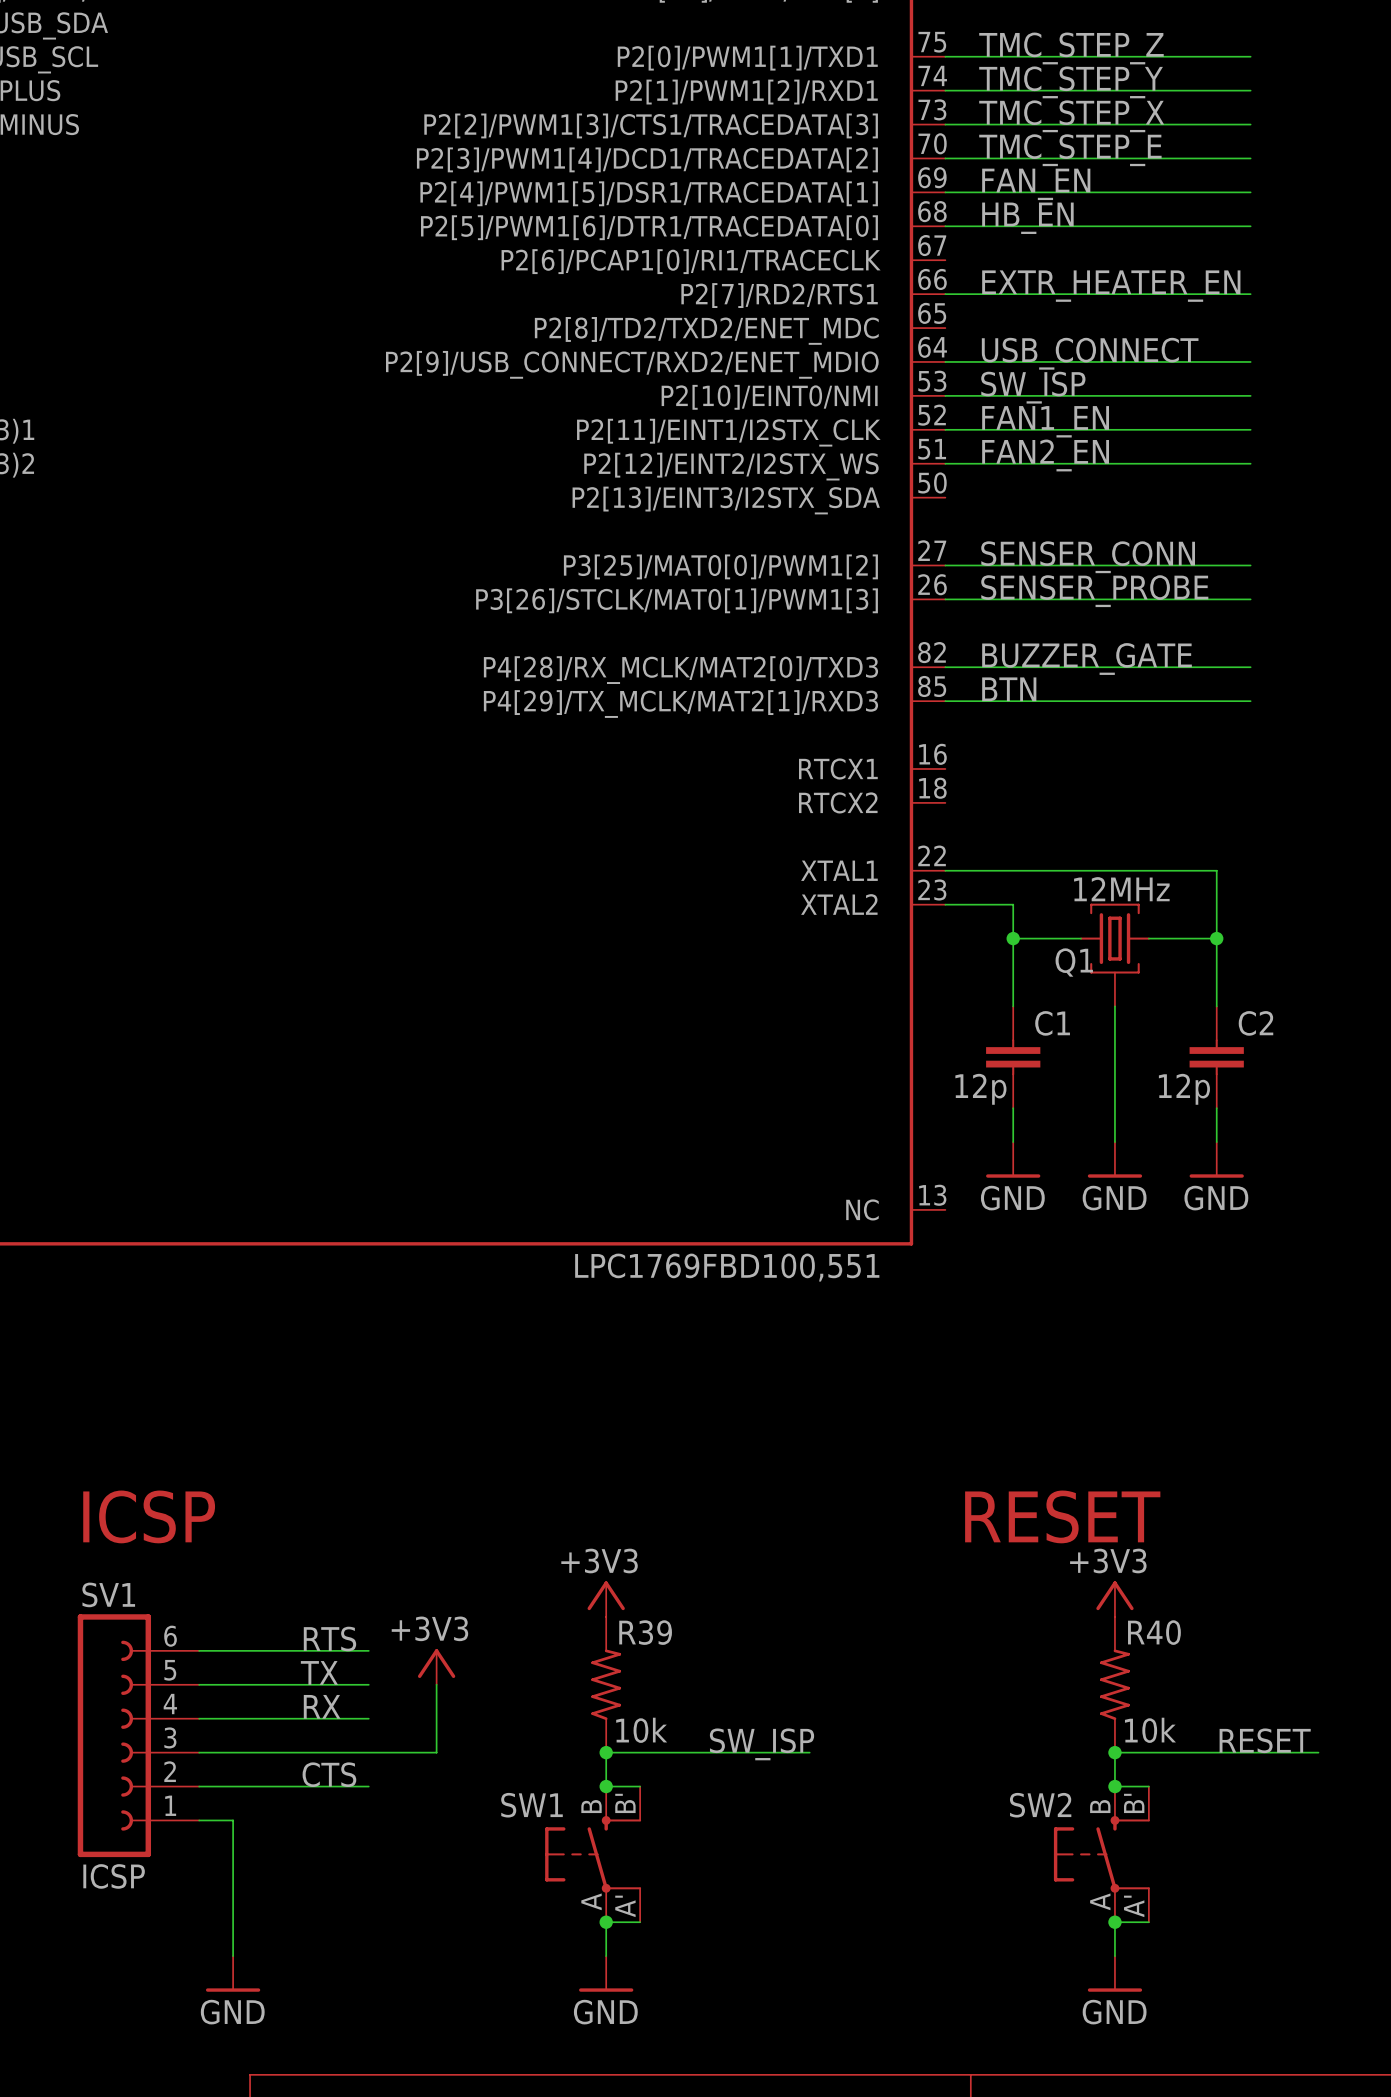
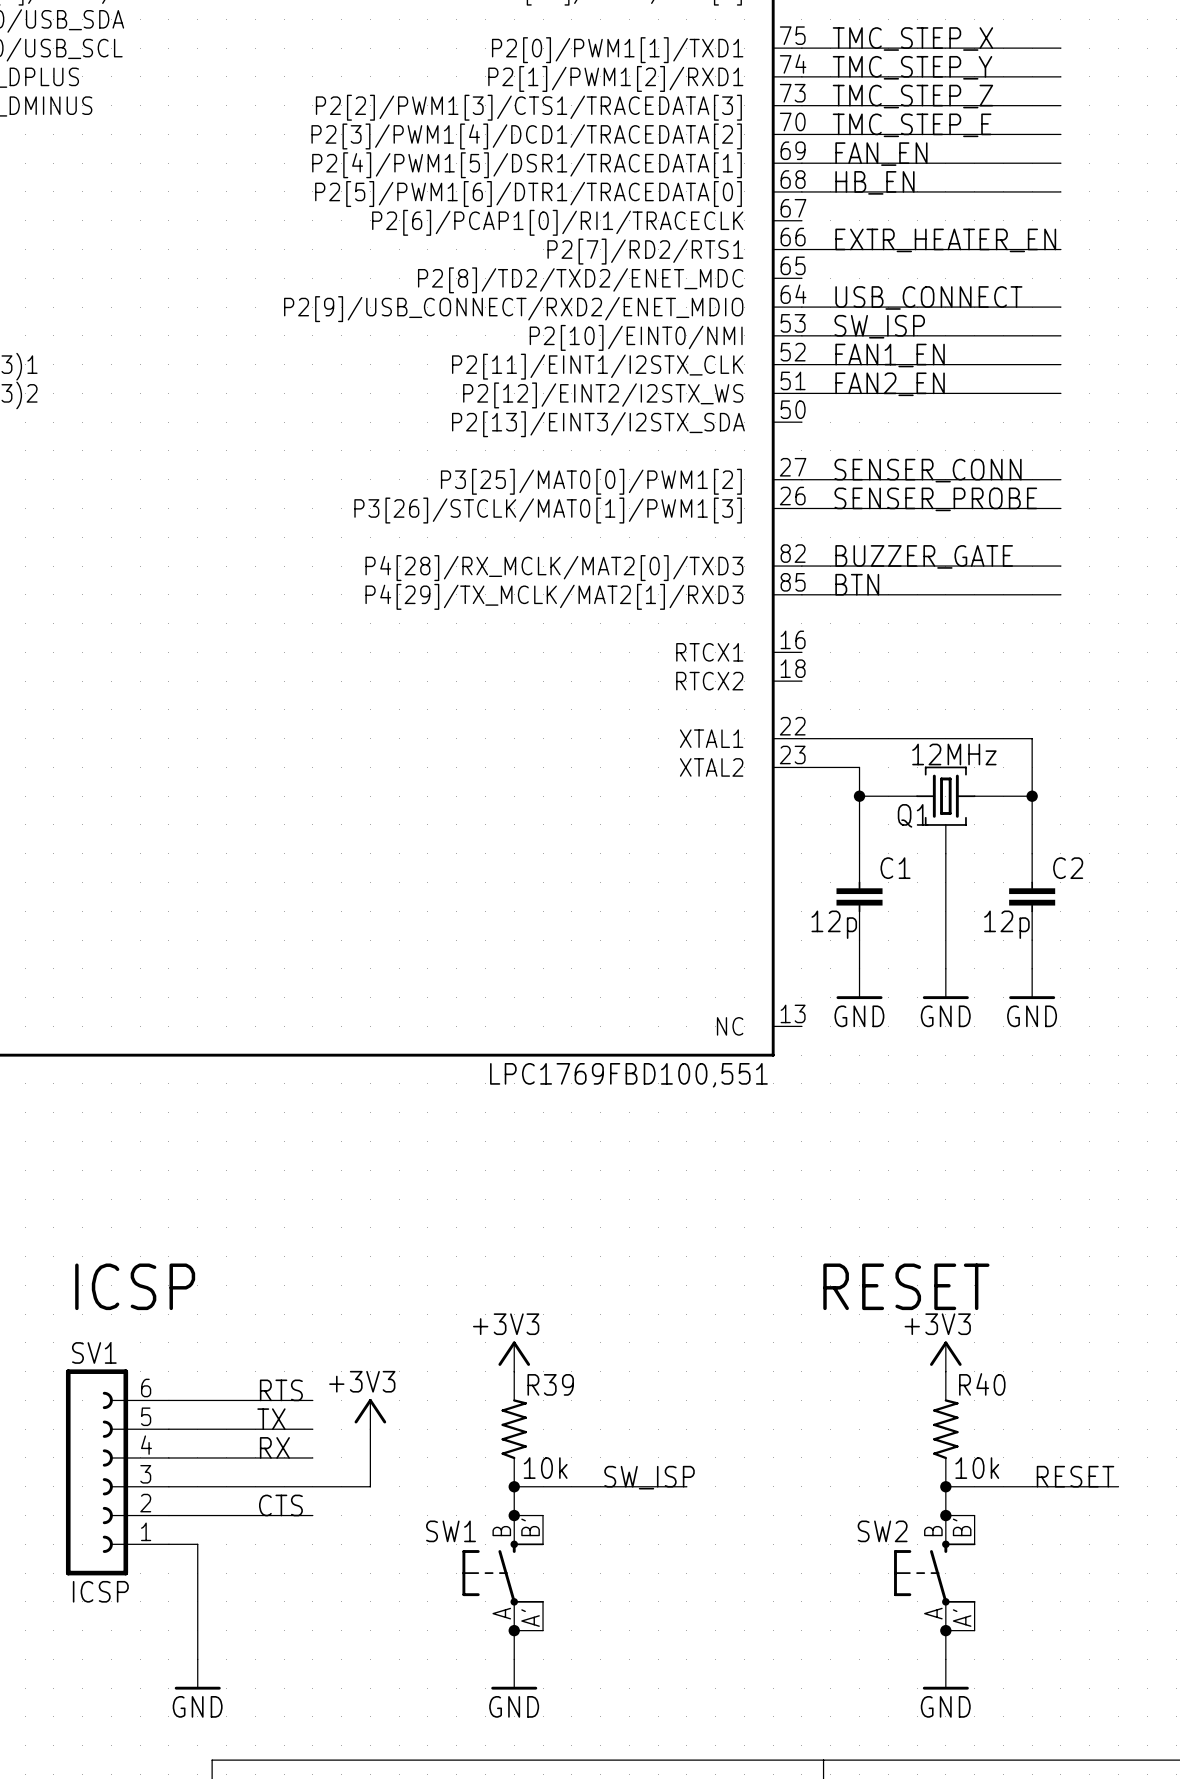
label: TMC_STEP_Z (1071, 48) -> TMC_STEP_X (912, 39)
label: TMC_STEP_X (1071, 116) -> TMC_STEP_Z (912, 96)

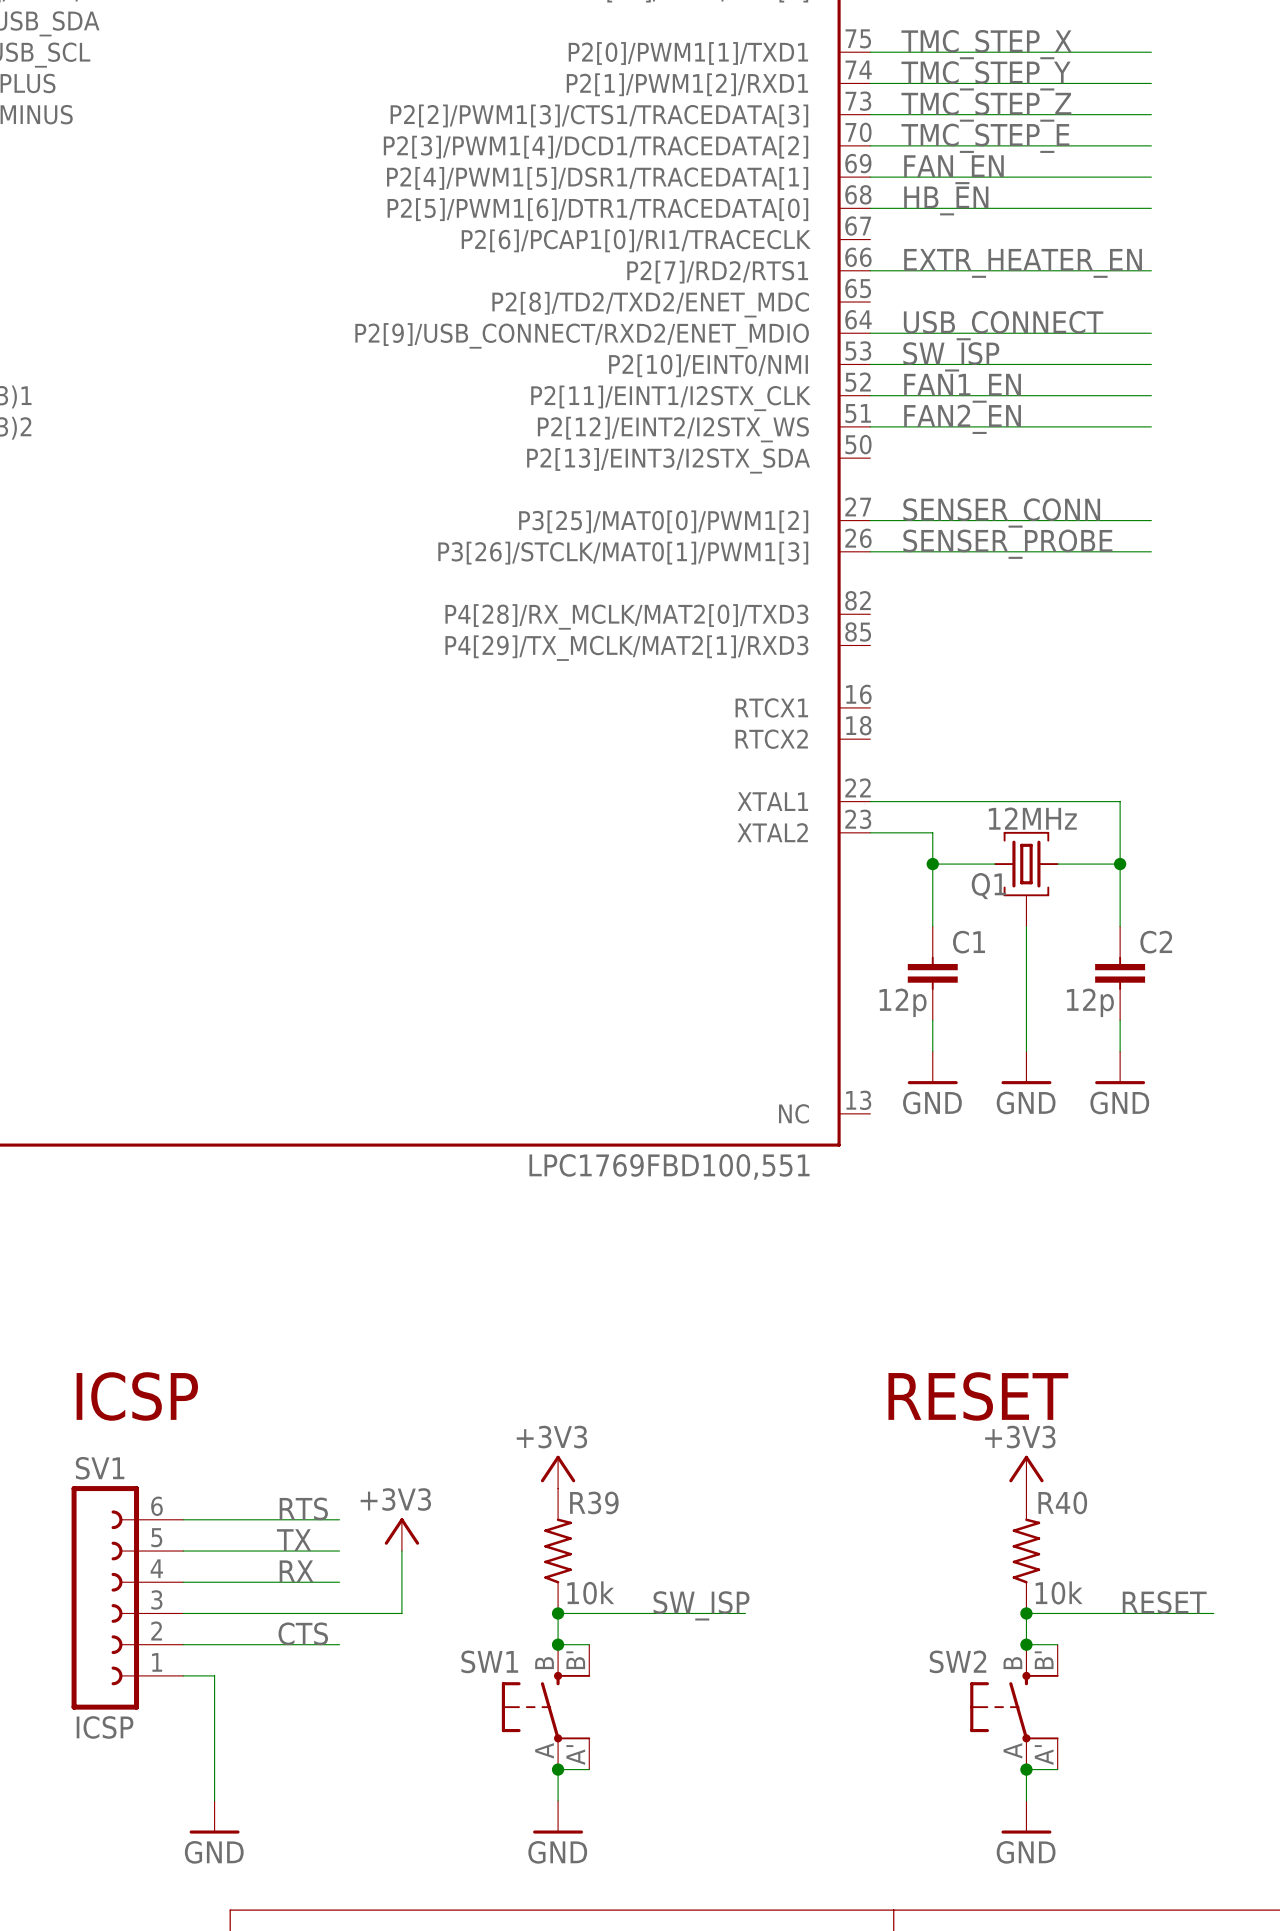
label: BUZZER_GATE (924, 556) -> none
wire: (801, 566) (1060, 566) -> none
label: BTN (857, 584) -> none
wire: (801, 594) (1060, 594) -> none

